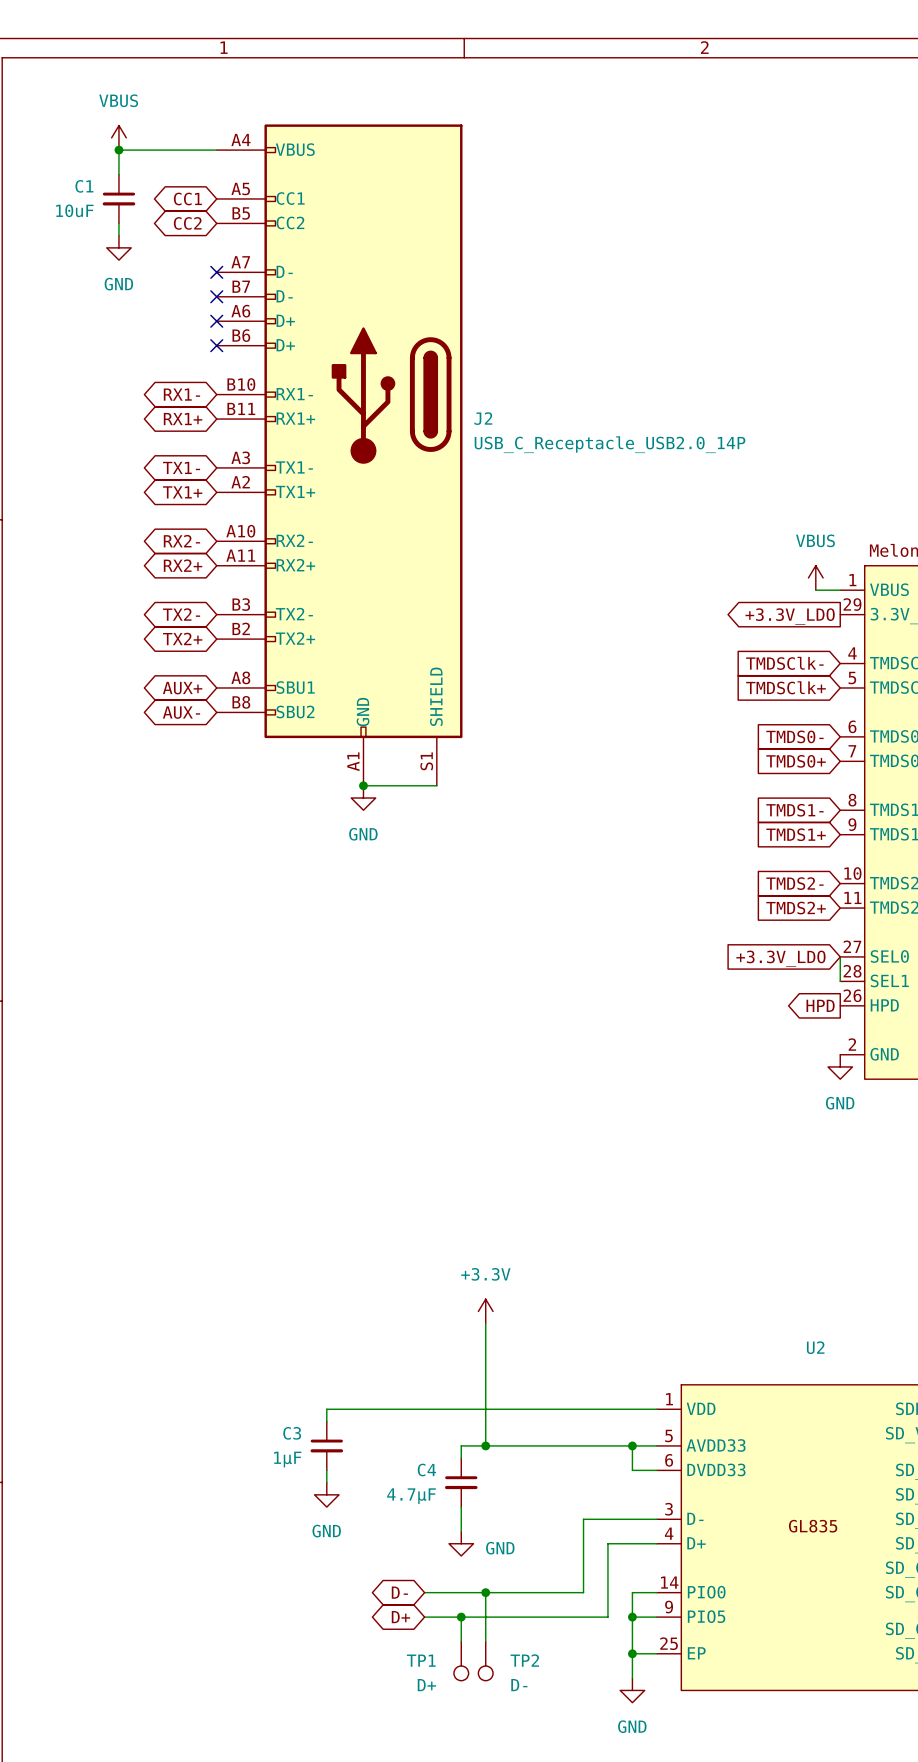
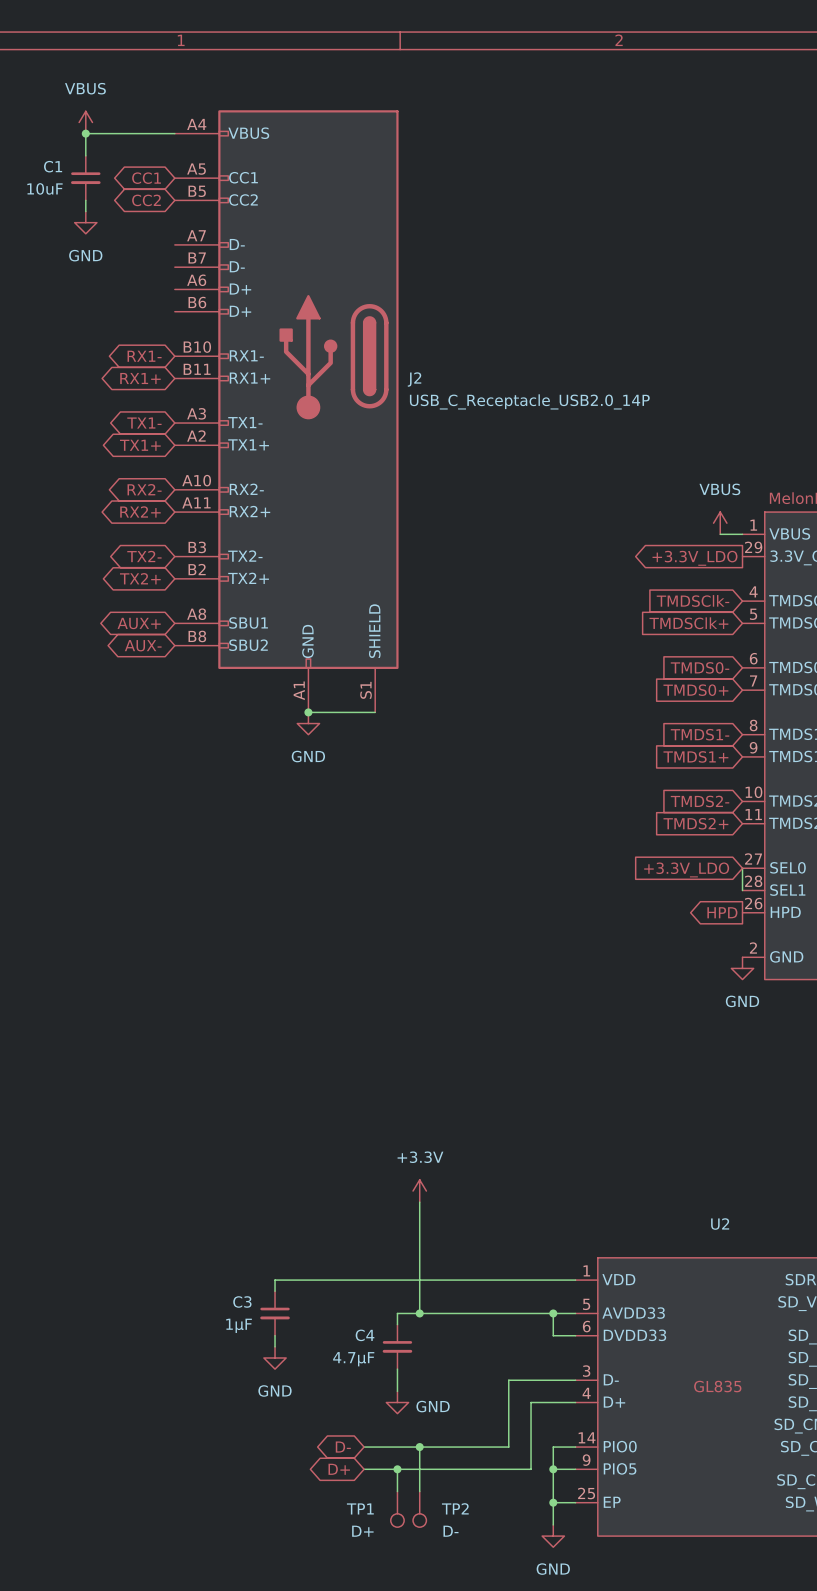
no-connect mark: (216, 272) -> none
no-connect mark: (216, 296) -> none
no-connect mark: (216, 321) -> none
no-connect mark: (216, 345) -> none

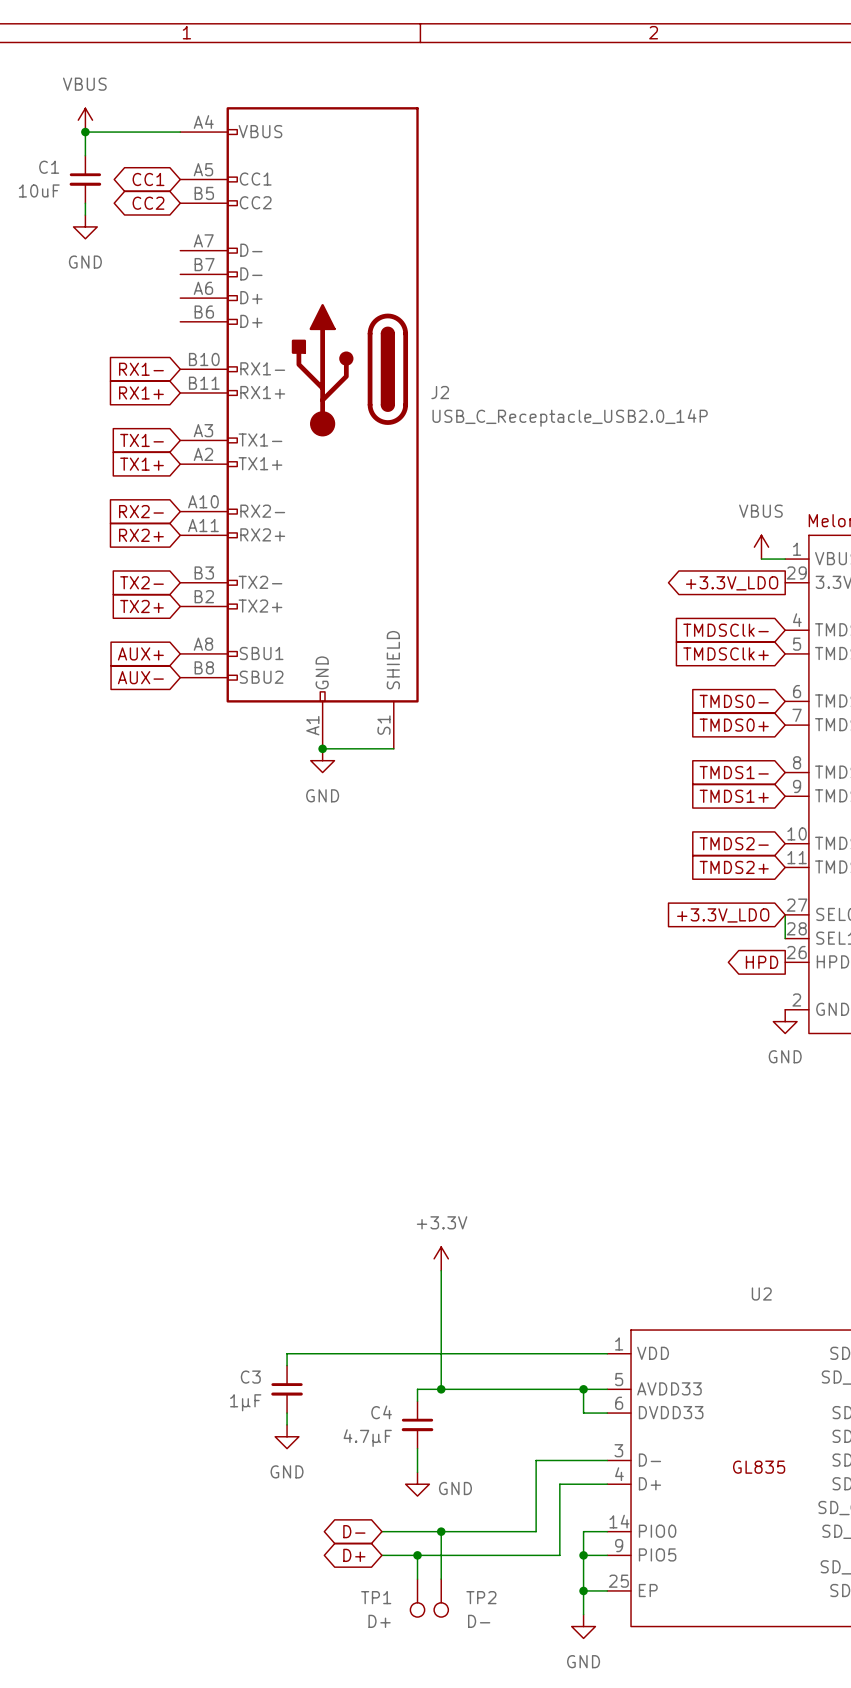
global label shape: bidirectional (144, 356) -> input (141, 369)
global label shape: bidirectional (140, 378) -> input (141, 392)
global label shape: bidirectional (144, 423) -> input (142, 440)
global label shape: bidirectional (140, 445) -> input (142, 464)
global label shape: bidirectional (144, 489) -> input (141, 511)
global label shape: bidirectional (140, 511) -> input (141, 535)
global label shape: bidirectional (144, 556) -> input (142, 582)
global label shape: bidirectional (140, 578) -> input (142, 606)
global label shape: bidirectional (139, 623) -> input (140, 653)
global label shape: bidirectional (143, 645) -> input (140, 677)

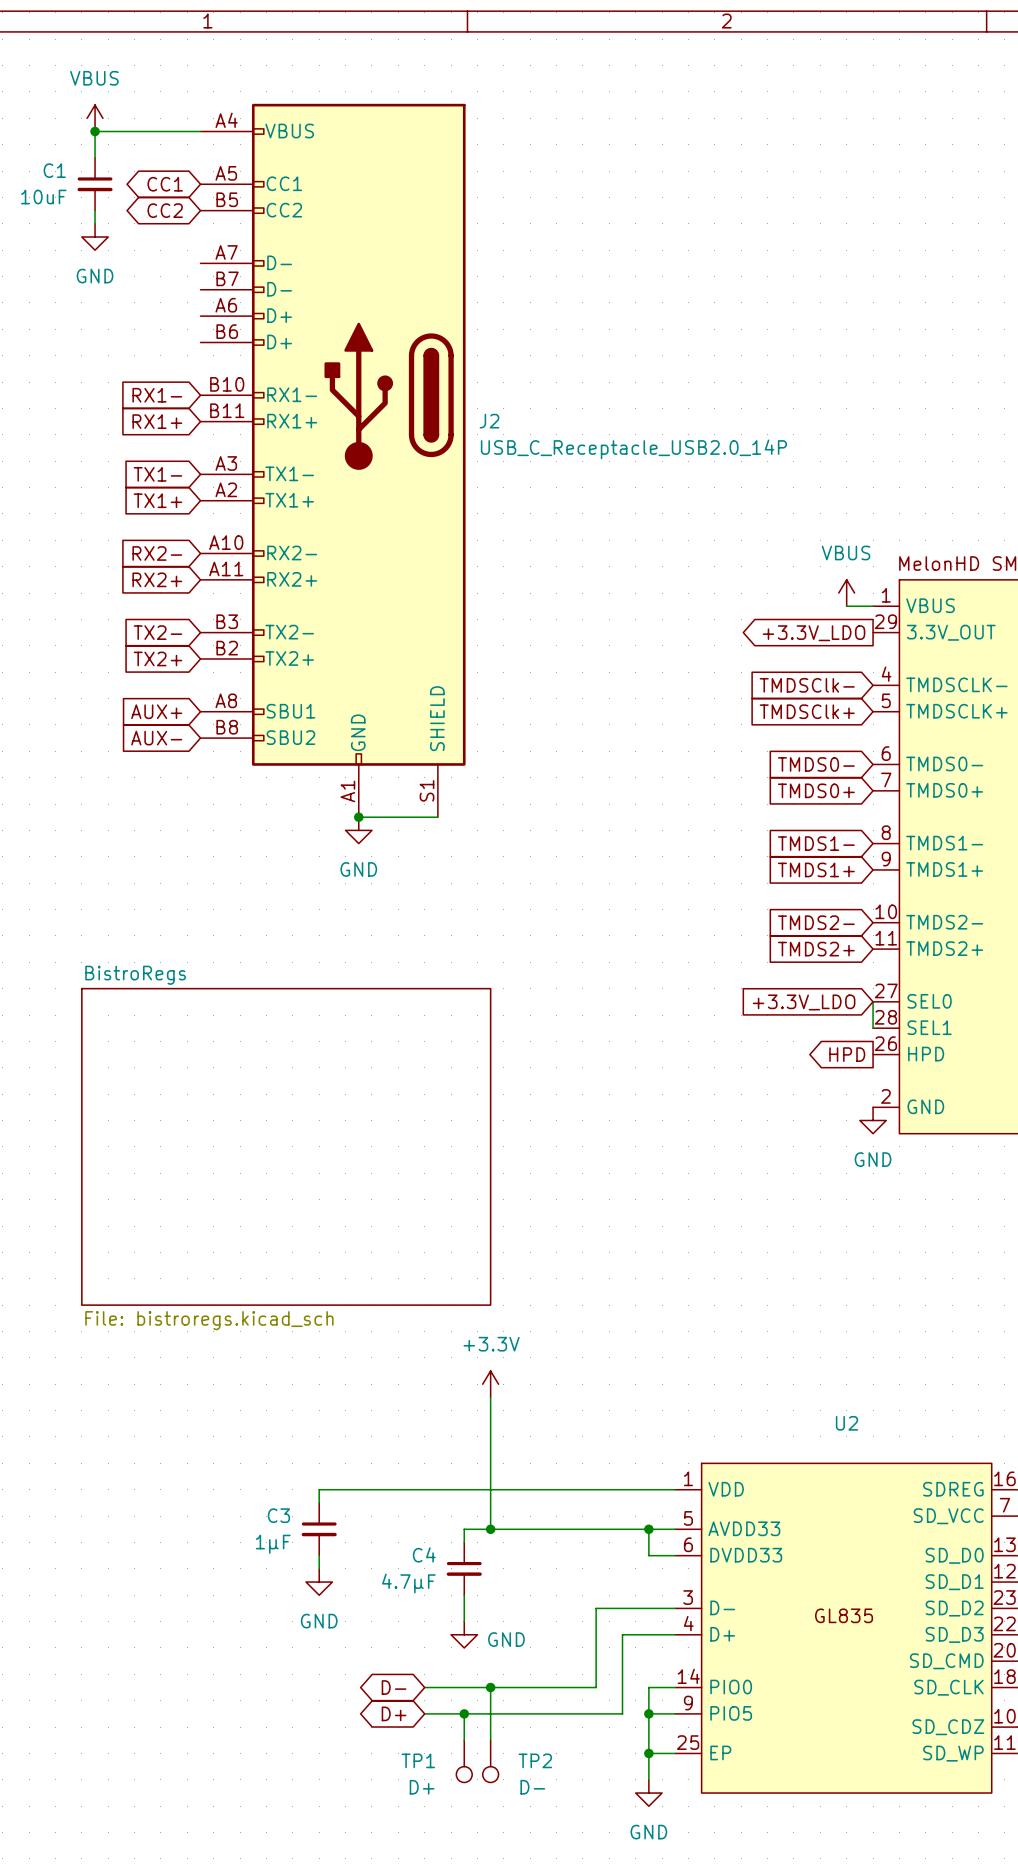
sheet BistroRegs: none -> File: bistroregs.kicad_sch (286, 1146)

